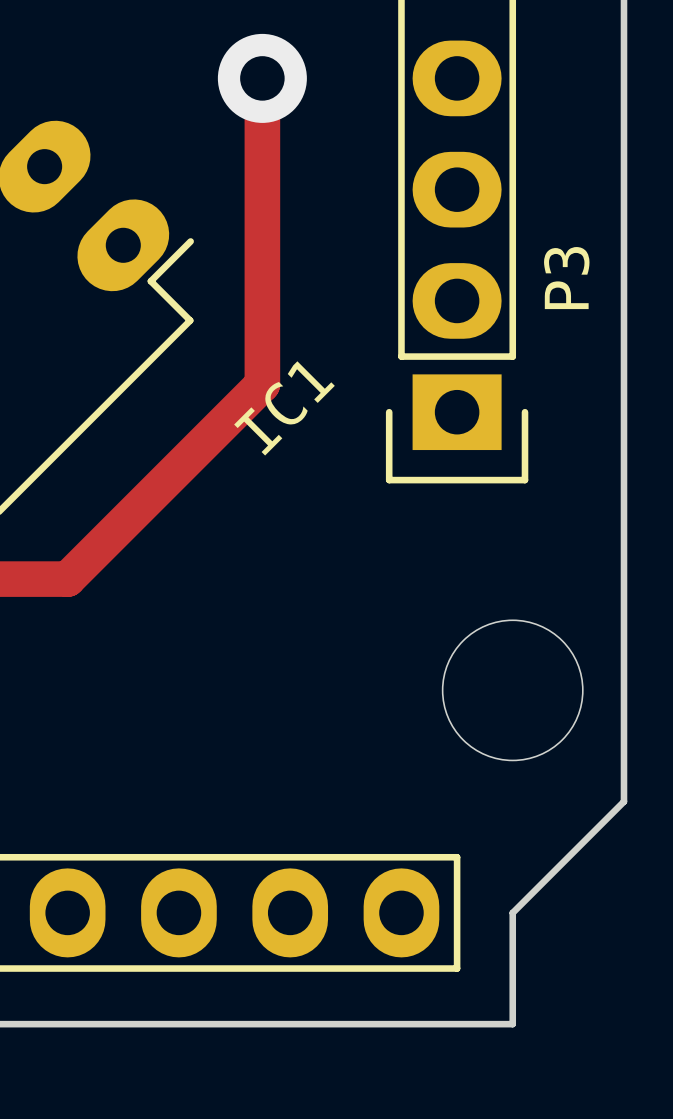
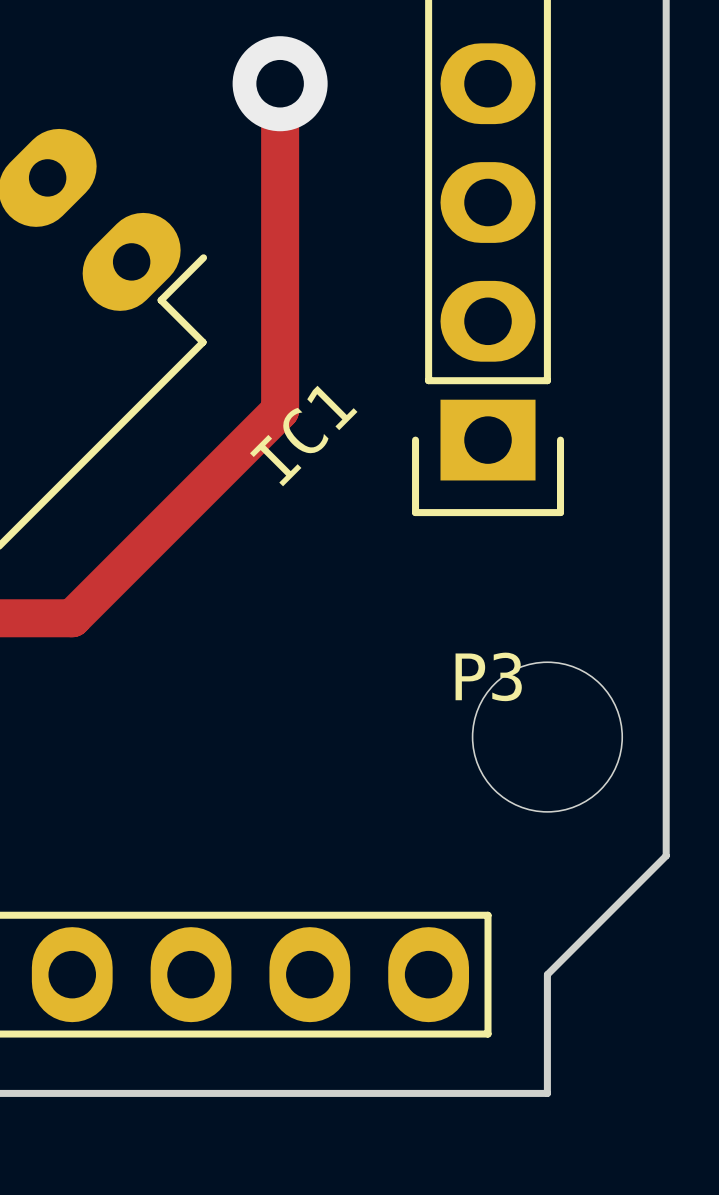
P3 name rotation: 0° (566, 278) -> 90° clockwise (488, 676)
P3 name position: P3 (566, 278) -> P3 (488, 676)

